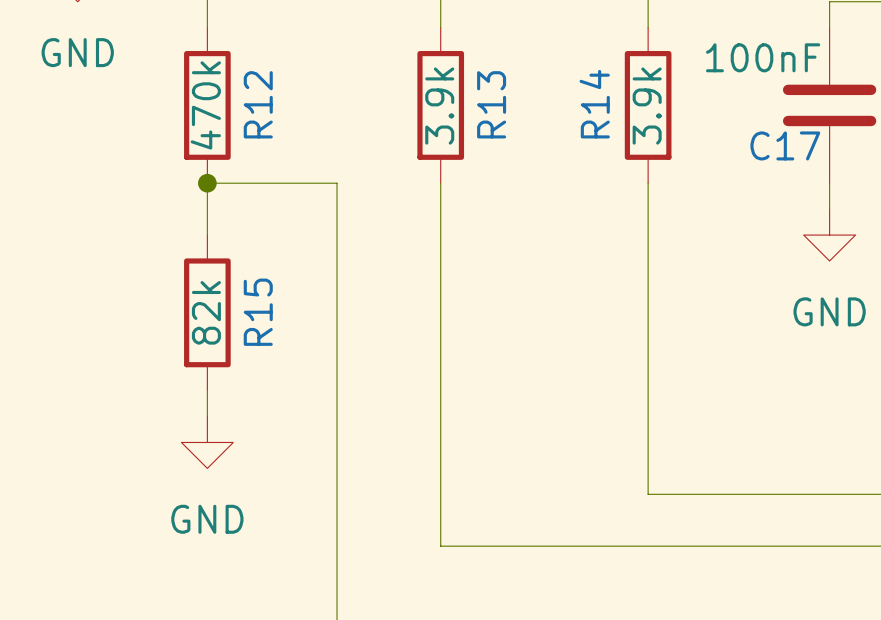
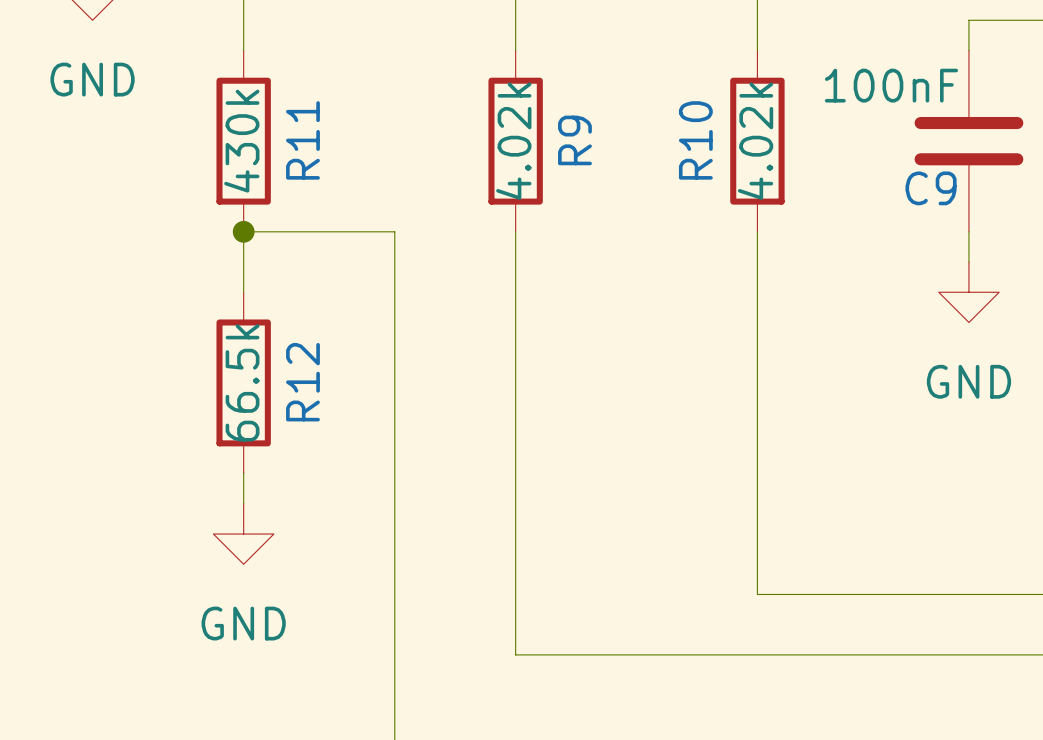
R12 name: R12 (258, 104) -> R11 (302, 140)
R13 name: R13 (491, 104) -> R9 (574, 140)
R14 name: R14 (594, 104) -> R10 (695, 140)
R12 value: 470k (205, 105) -> 430k (241, 141)
R13 value: 3.9k (439, 106) -> 4.02k (513, 141)
R14 value: 3.9k (647, 106) -> 4.02k (755, 141)
C17 name: C17 (785, 145) -> C9 (931, 188)
R15 value: 82k (206, 312) -> 66.5k (242, 382)
R15 name: R15 (258, 312) -> R12 (302, 382)

